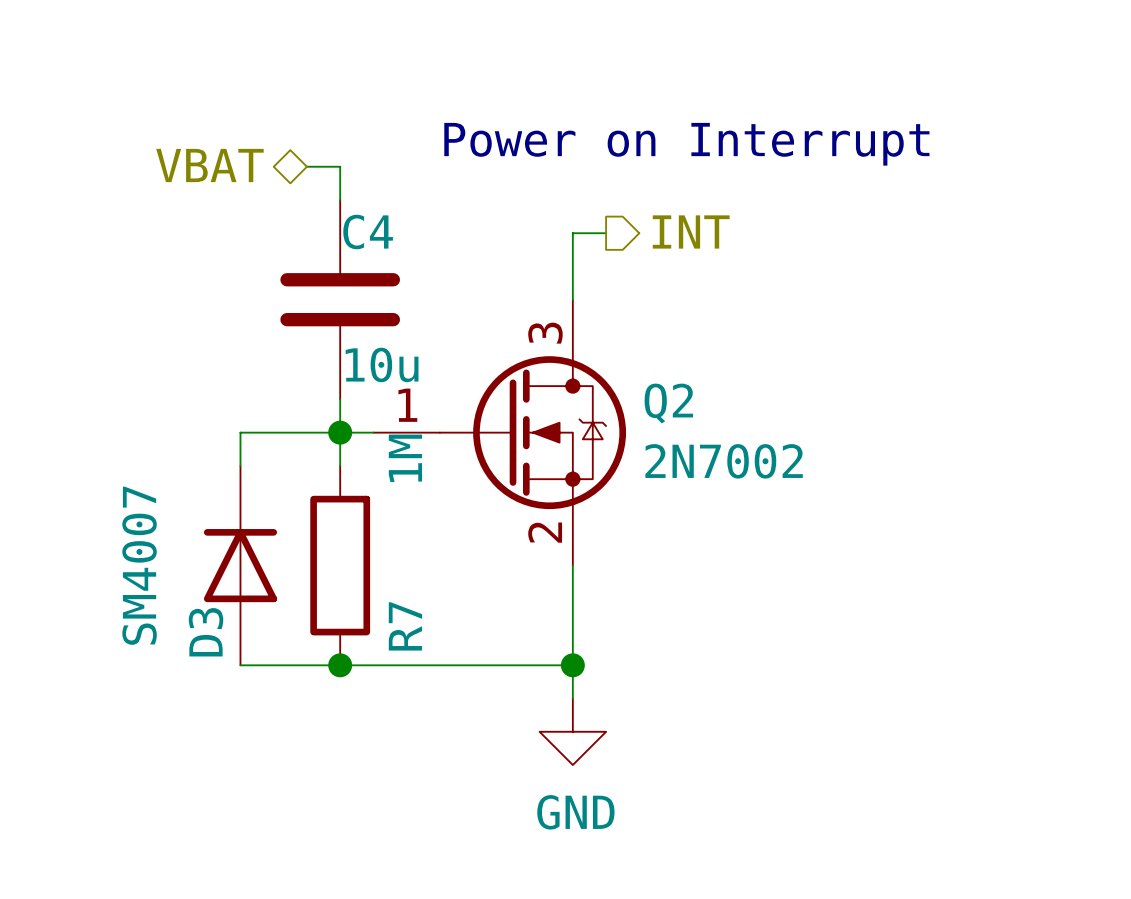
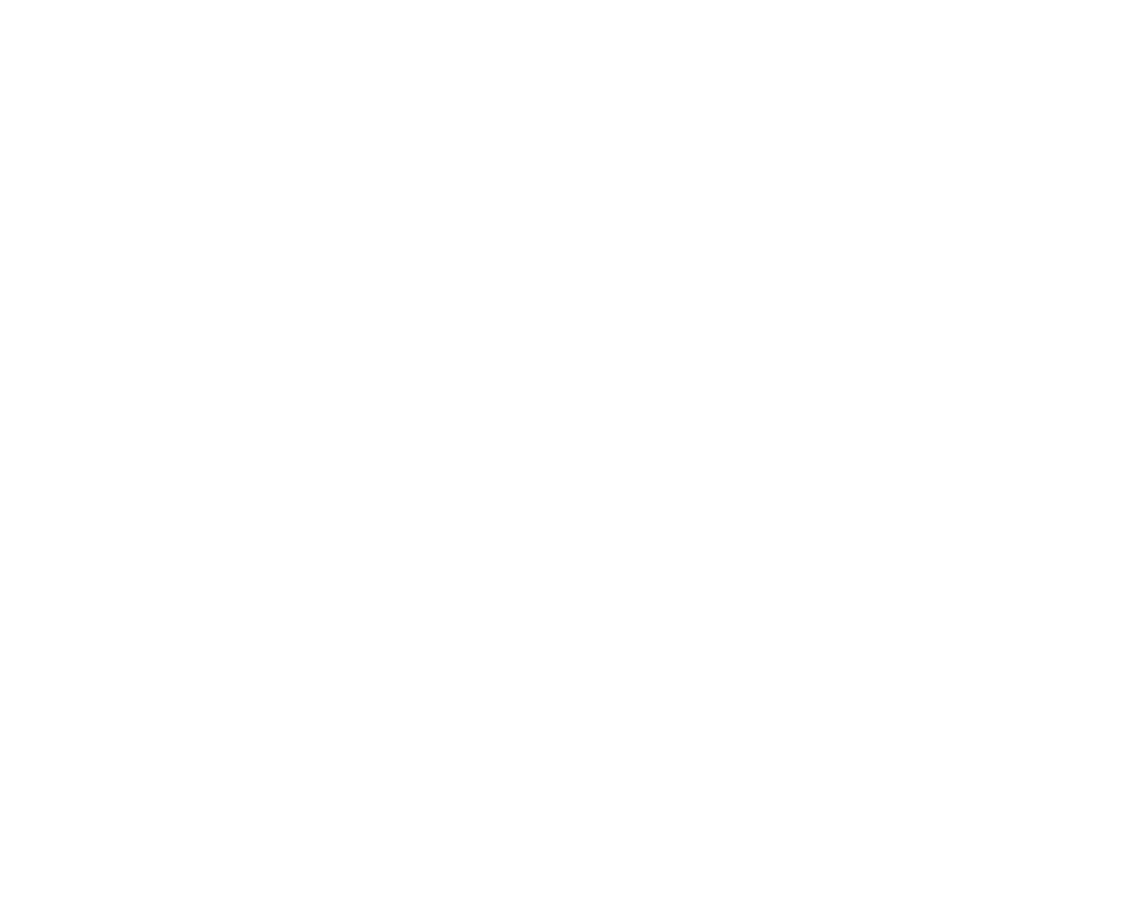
text: Power on Interrupt (686, 144) -> none
hierarchical label: VBAT (209, 165) -> none
wire: (306, 166) (340, 166) (340, 199) -> none
hierarchical label: INT (691, 231) -> none
wire: (606, 233) (572, 233) (572, 299) -> none
C4: 10u (340, 299) -> none
wire: (340, 399) (340, 465) -> none
junction: (340, 432) -> none
wire: (373, 432) (240, 432) (240, 465) -> none
Q2: 2N7002 (499, 432) -> none
D3: SM4007 (240, 565) -> none
R7: 1M (340, 565) -> none
wire: (572, 565) (572, 698) -> none
wire: (240, 665) (572, 665) -> none
junction: (340, 665) -> none
junction: (572, 665) -> none
power symbol: GND (572, 731) -> none

